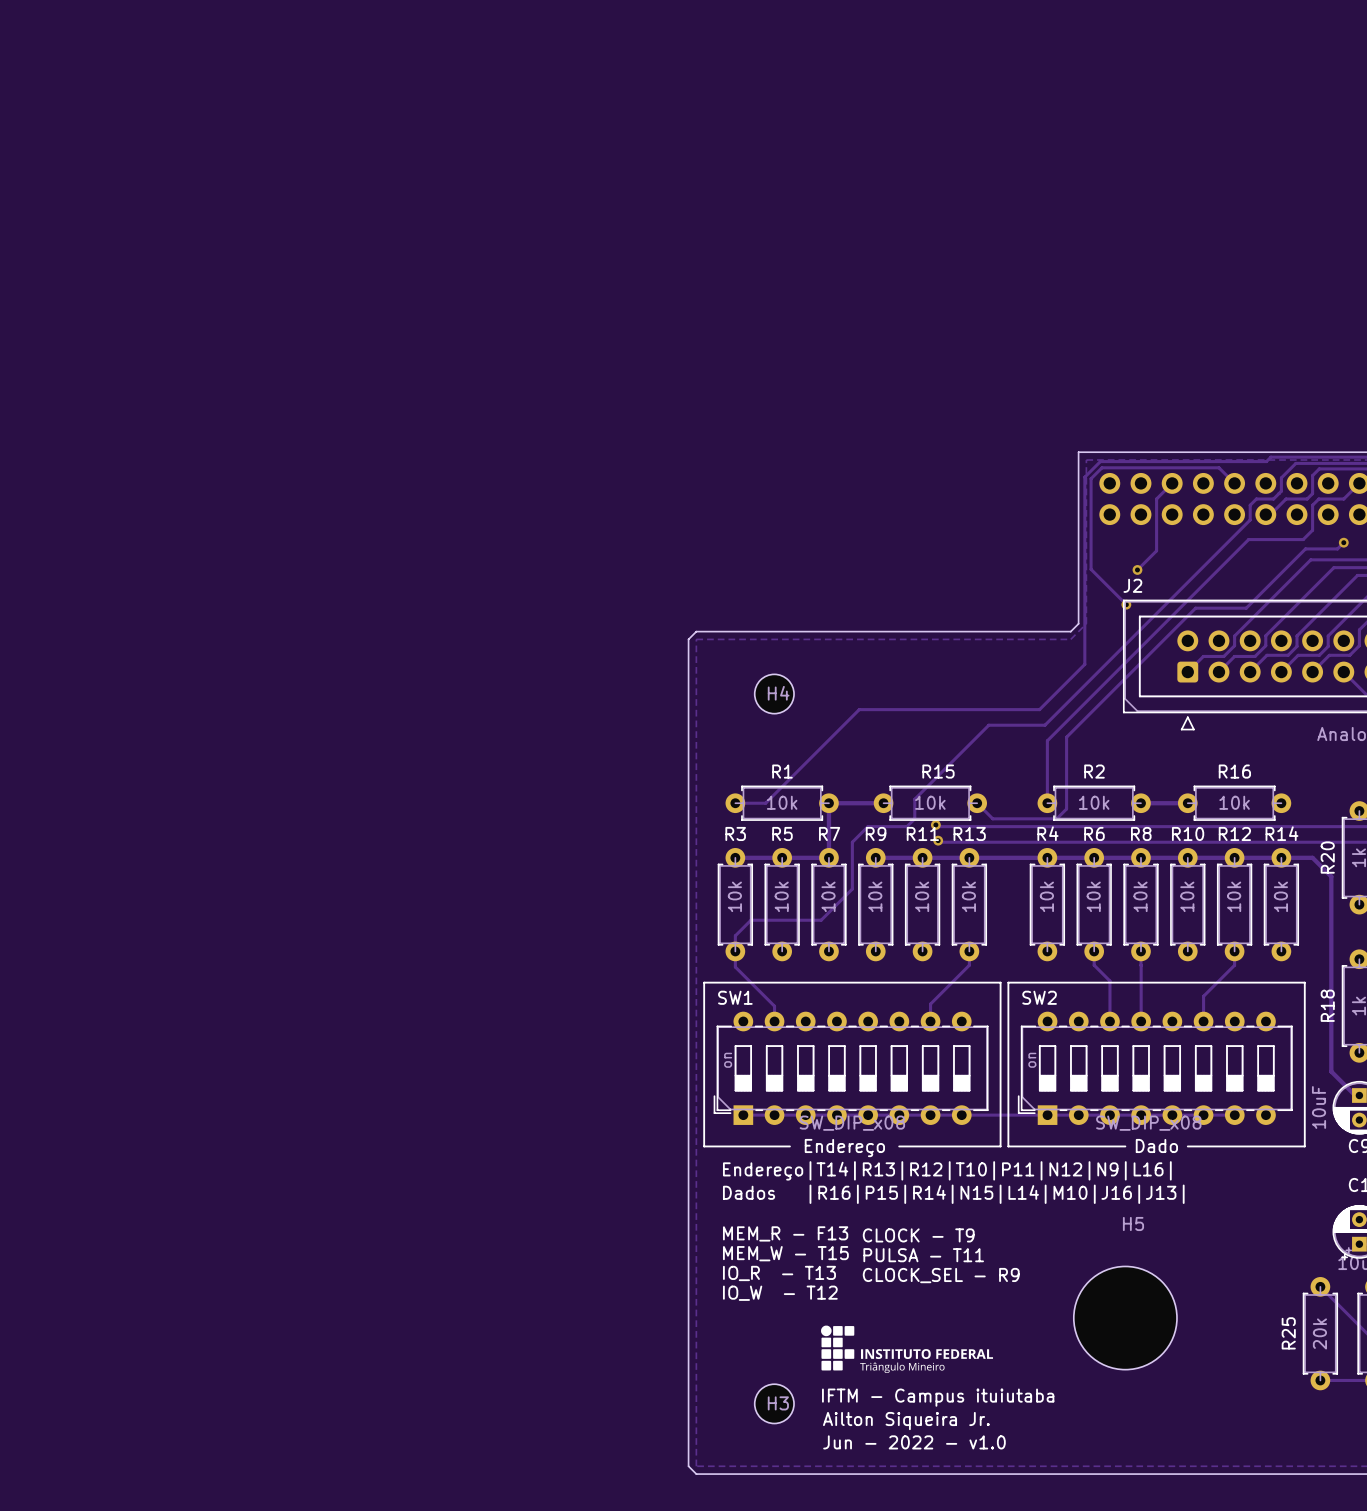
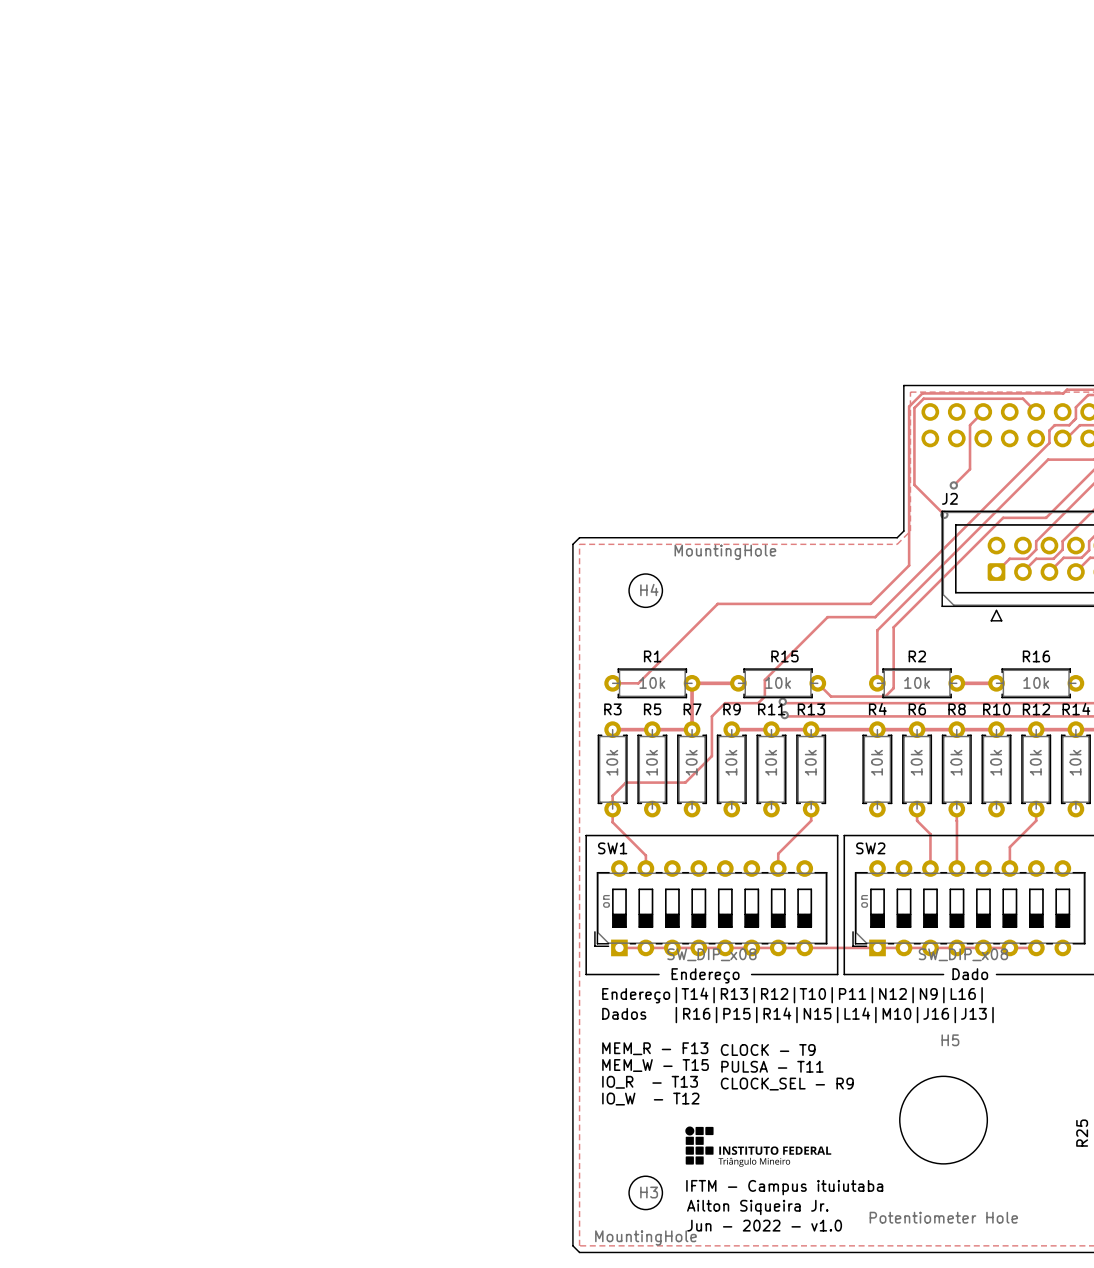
H4 value: none -> MountingHole (725, 552)
H5 value: none -> Potentiometer Hole (943, 1217)
H3 value: none -> MountingHole (645, 1238)

